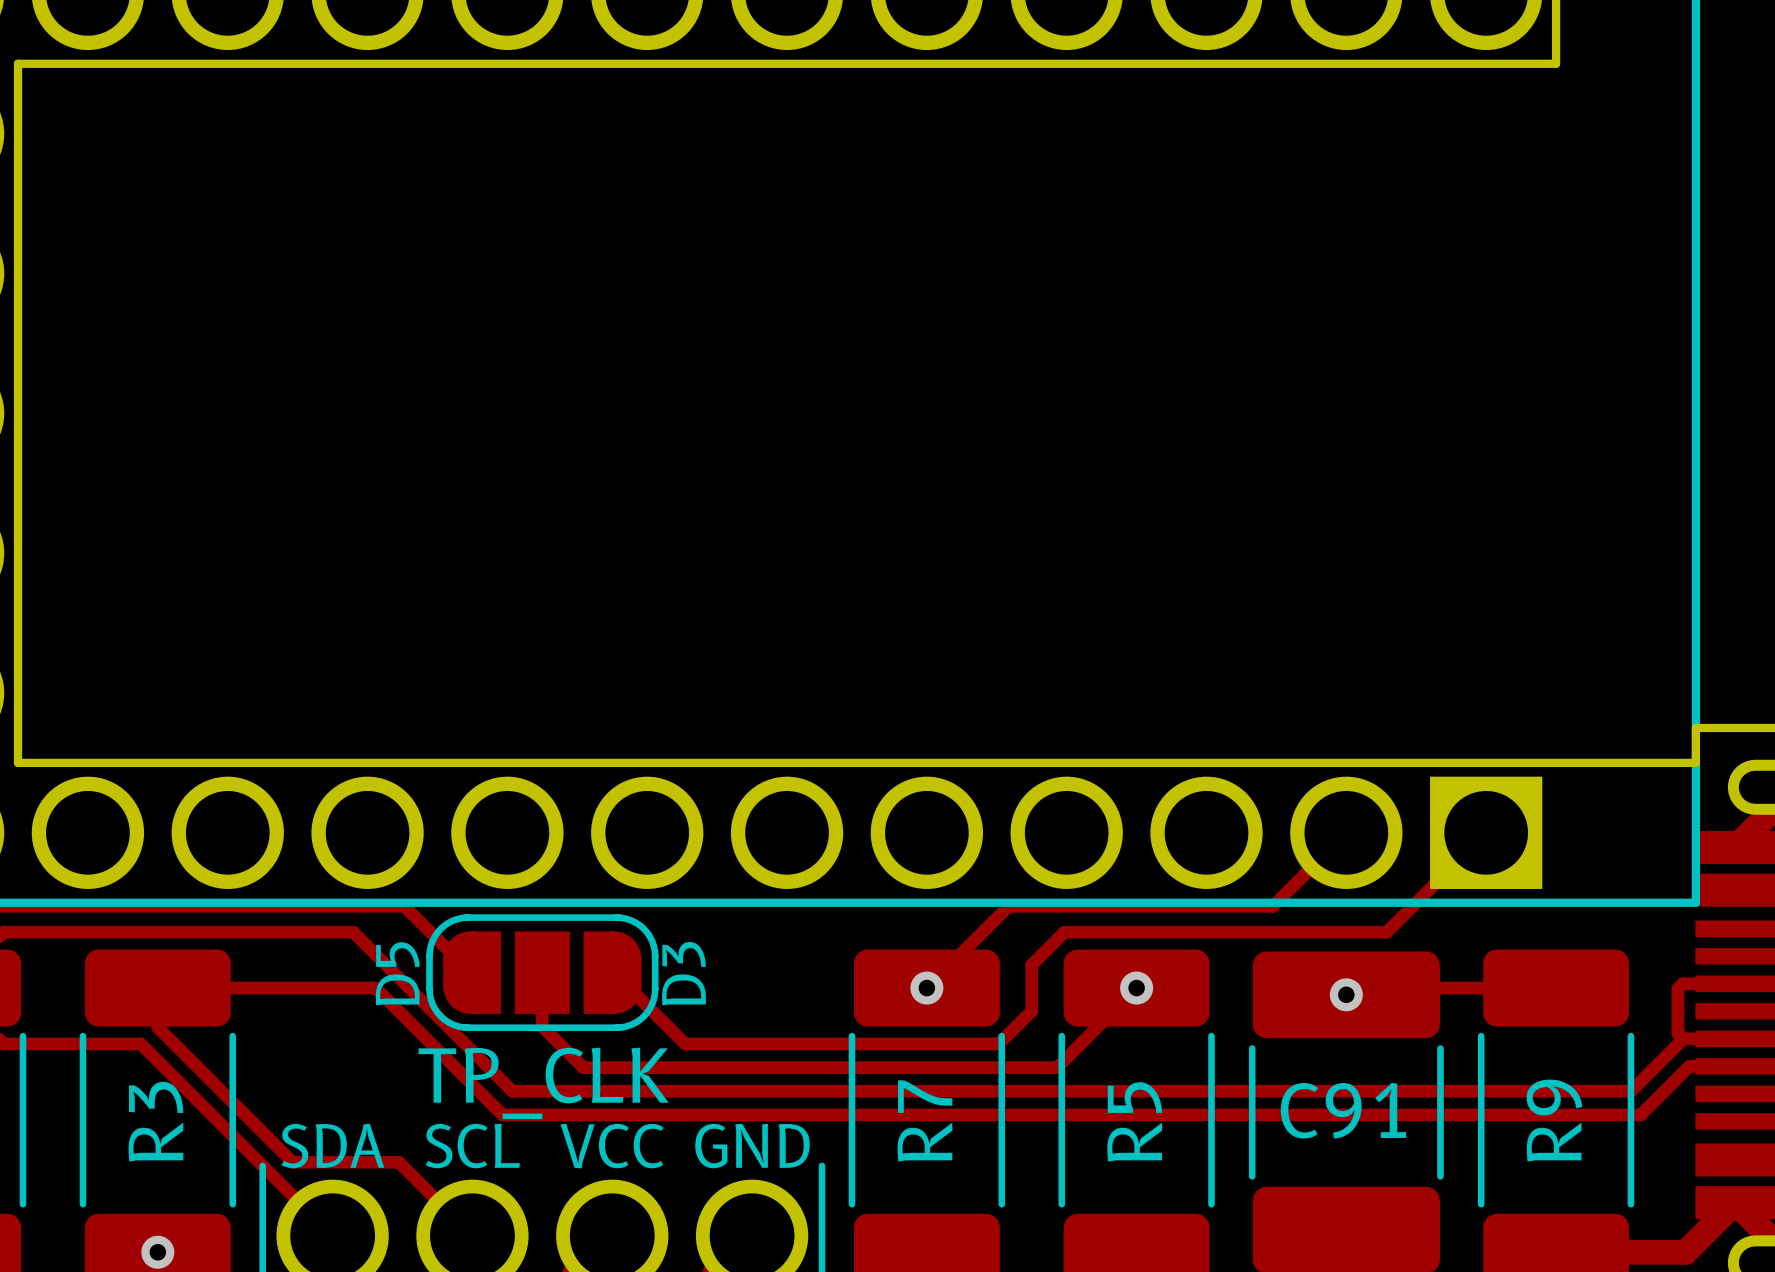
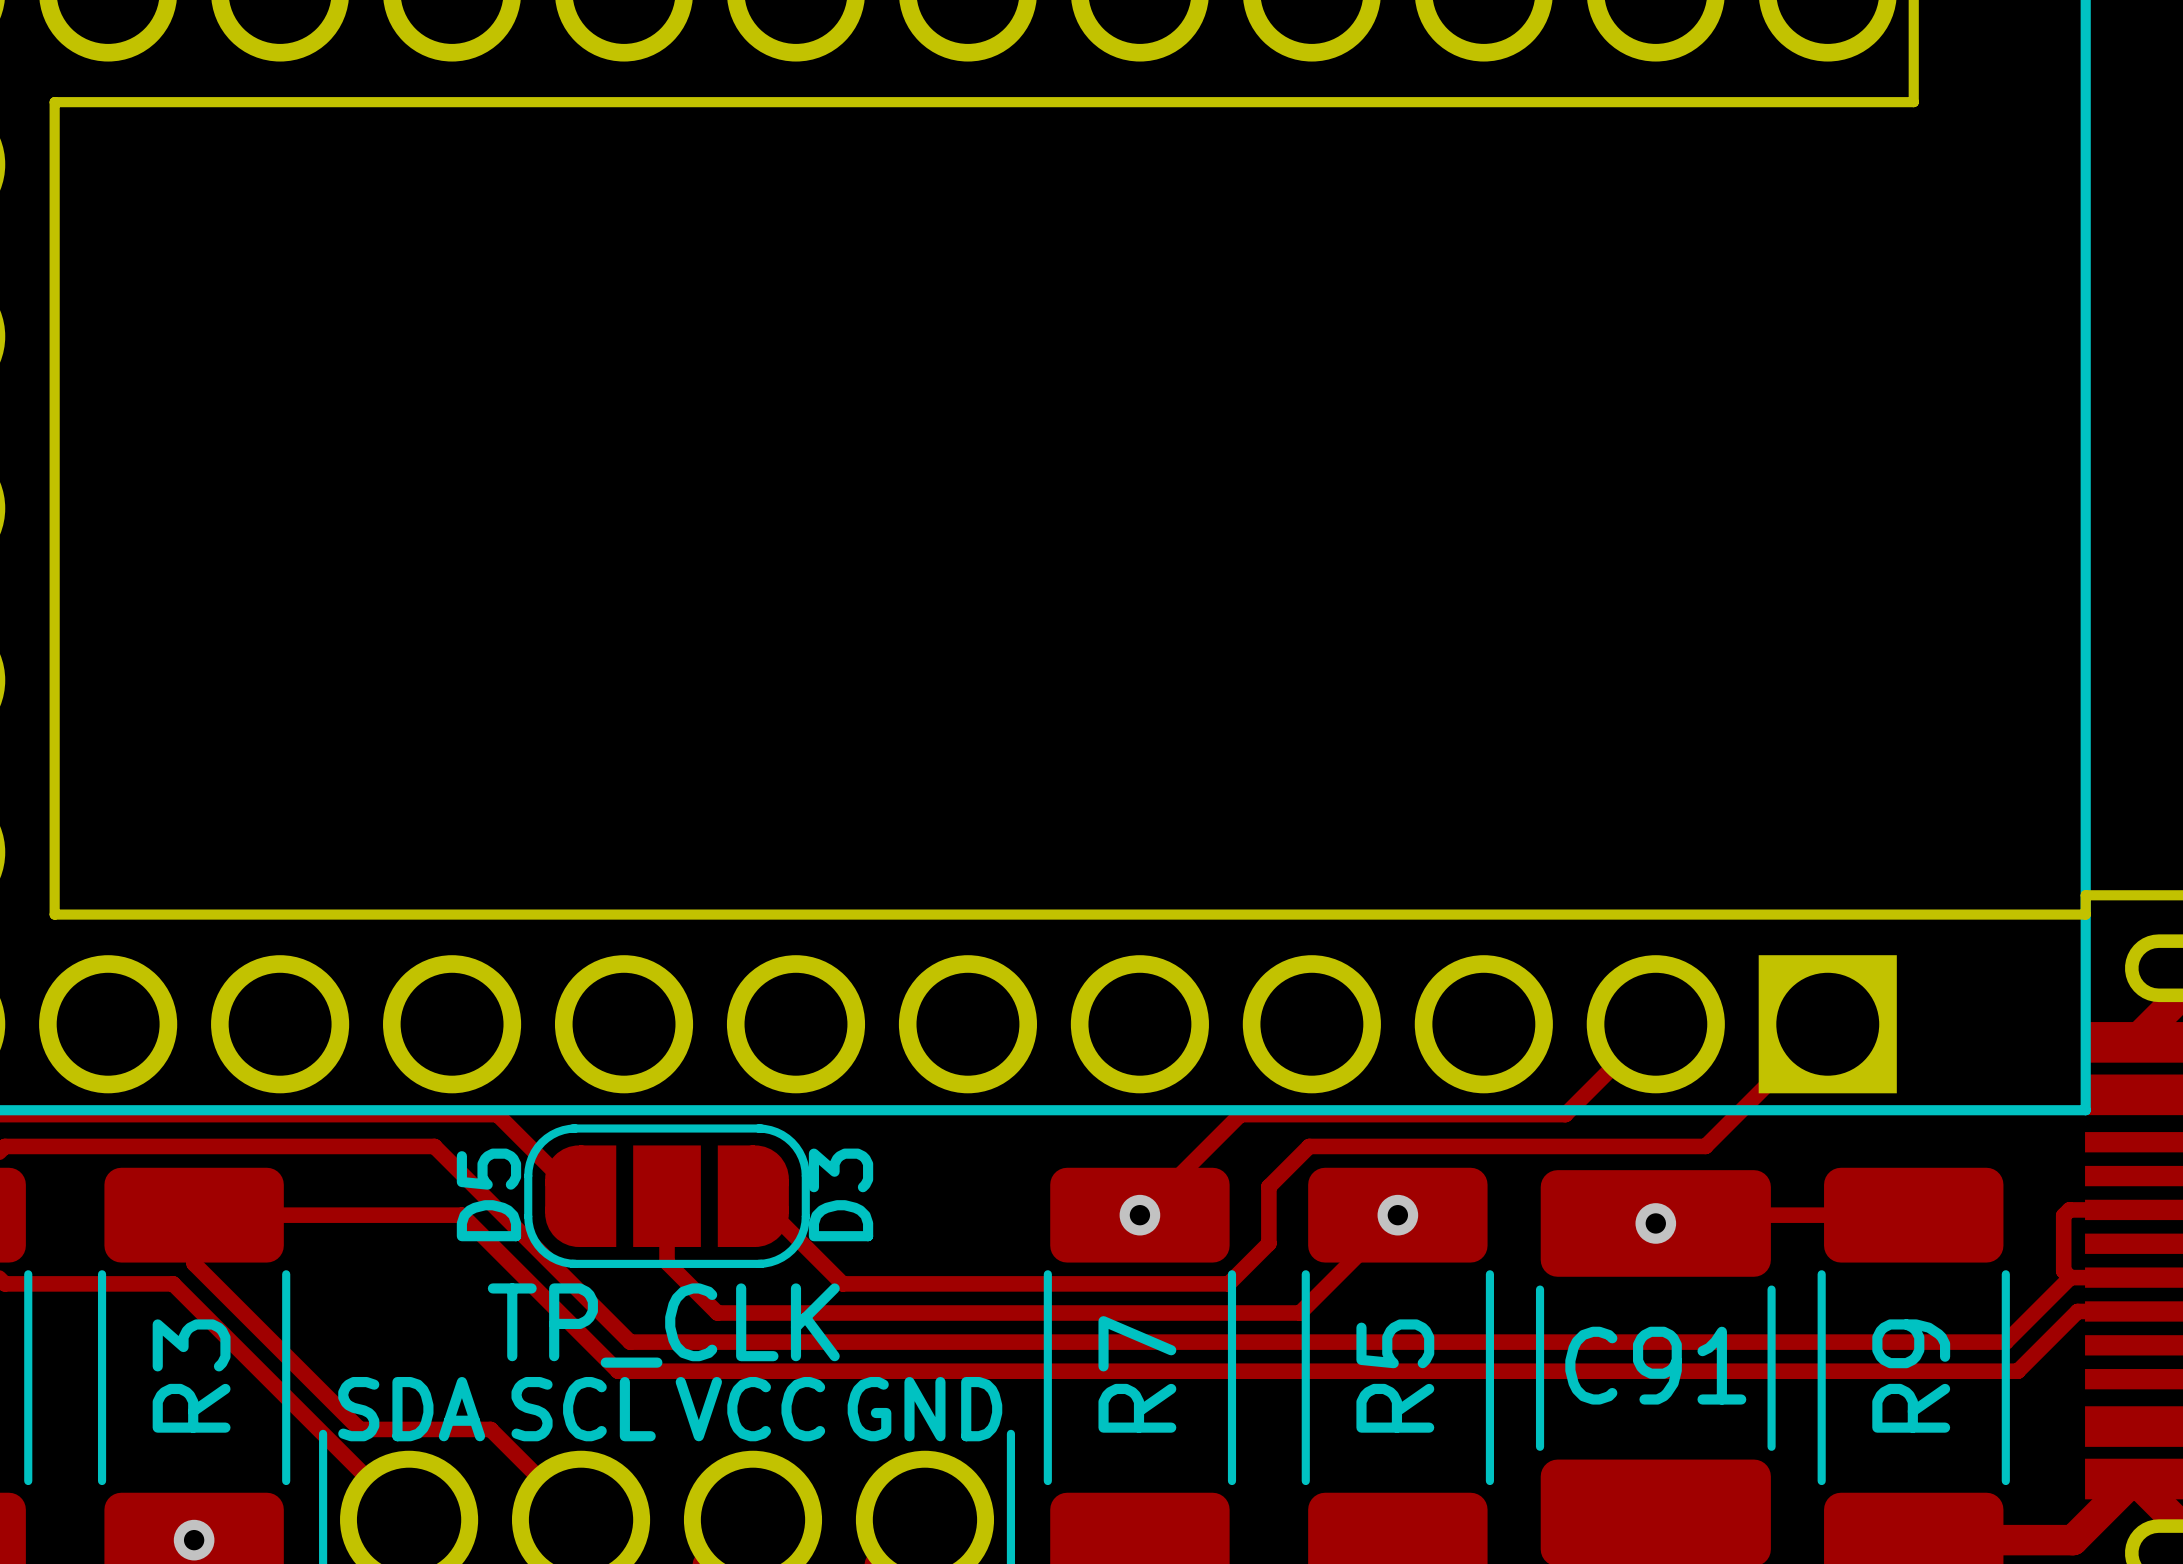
board edge: (1556, 63) (18, 63) (18, 762) (1695, 762) (1695, 743) -> (1913, 78) (1913, 102) (54, 102) (54, 914) (2085, 914)

